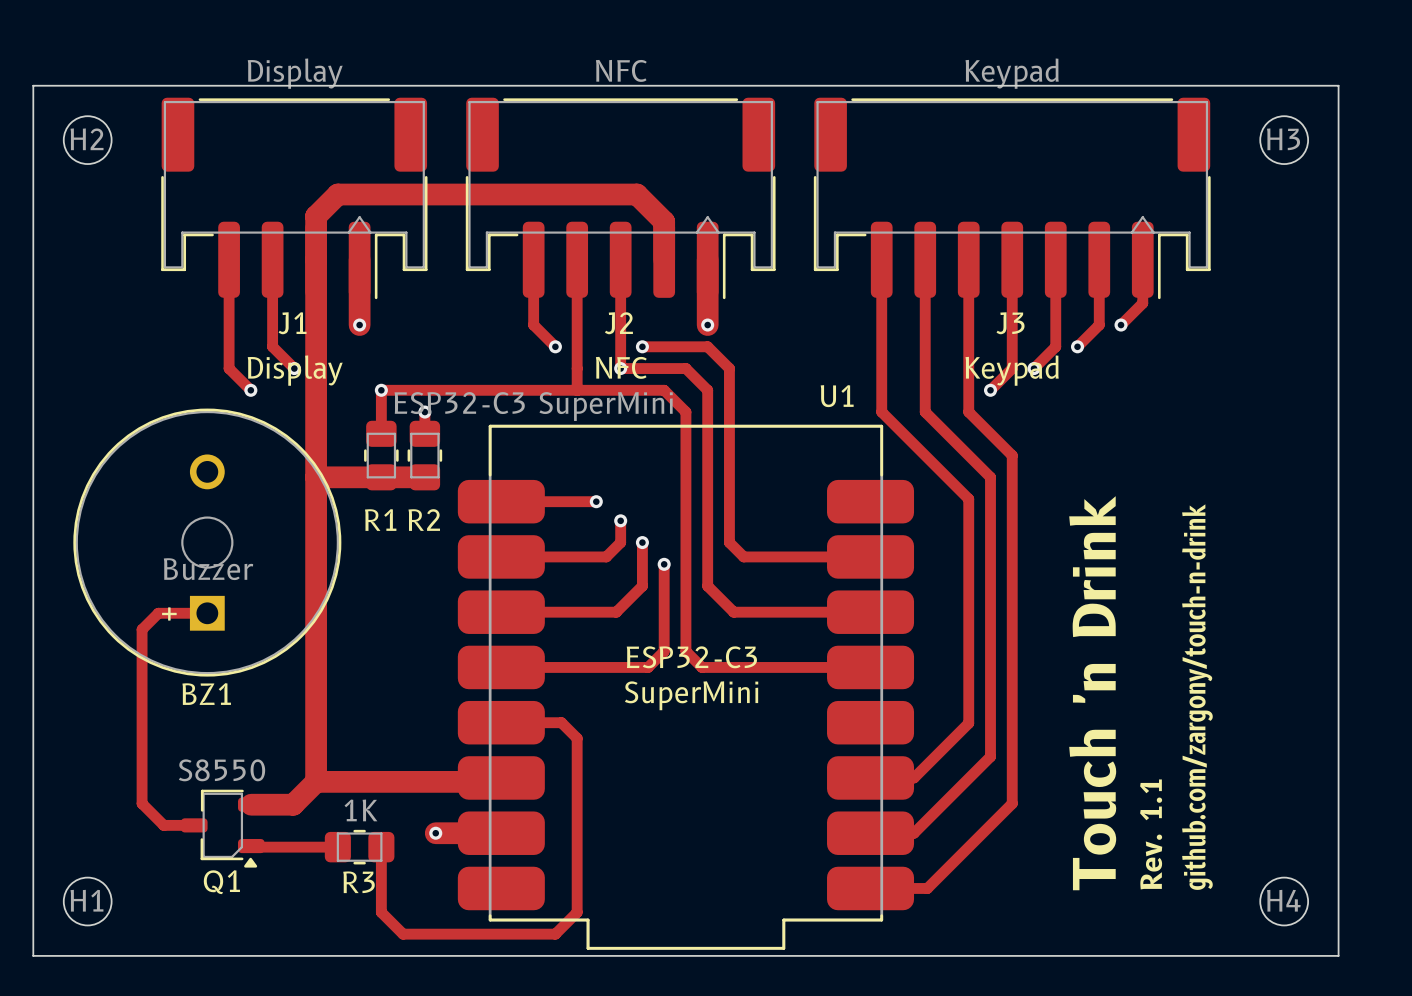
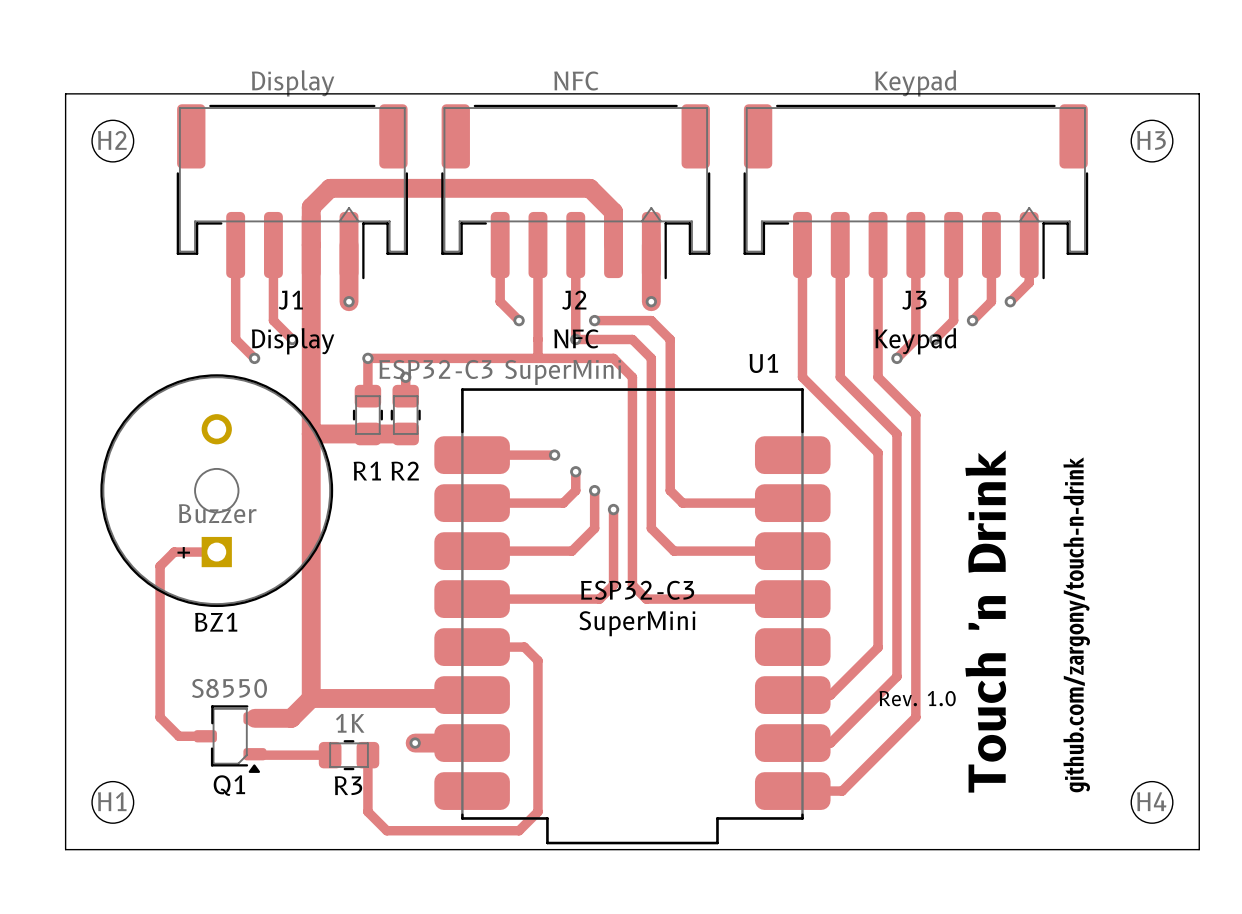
text: none -> Rev. 1.0 (917, 698)
text: Rev. 1.1 (1151, 834) -> none

